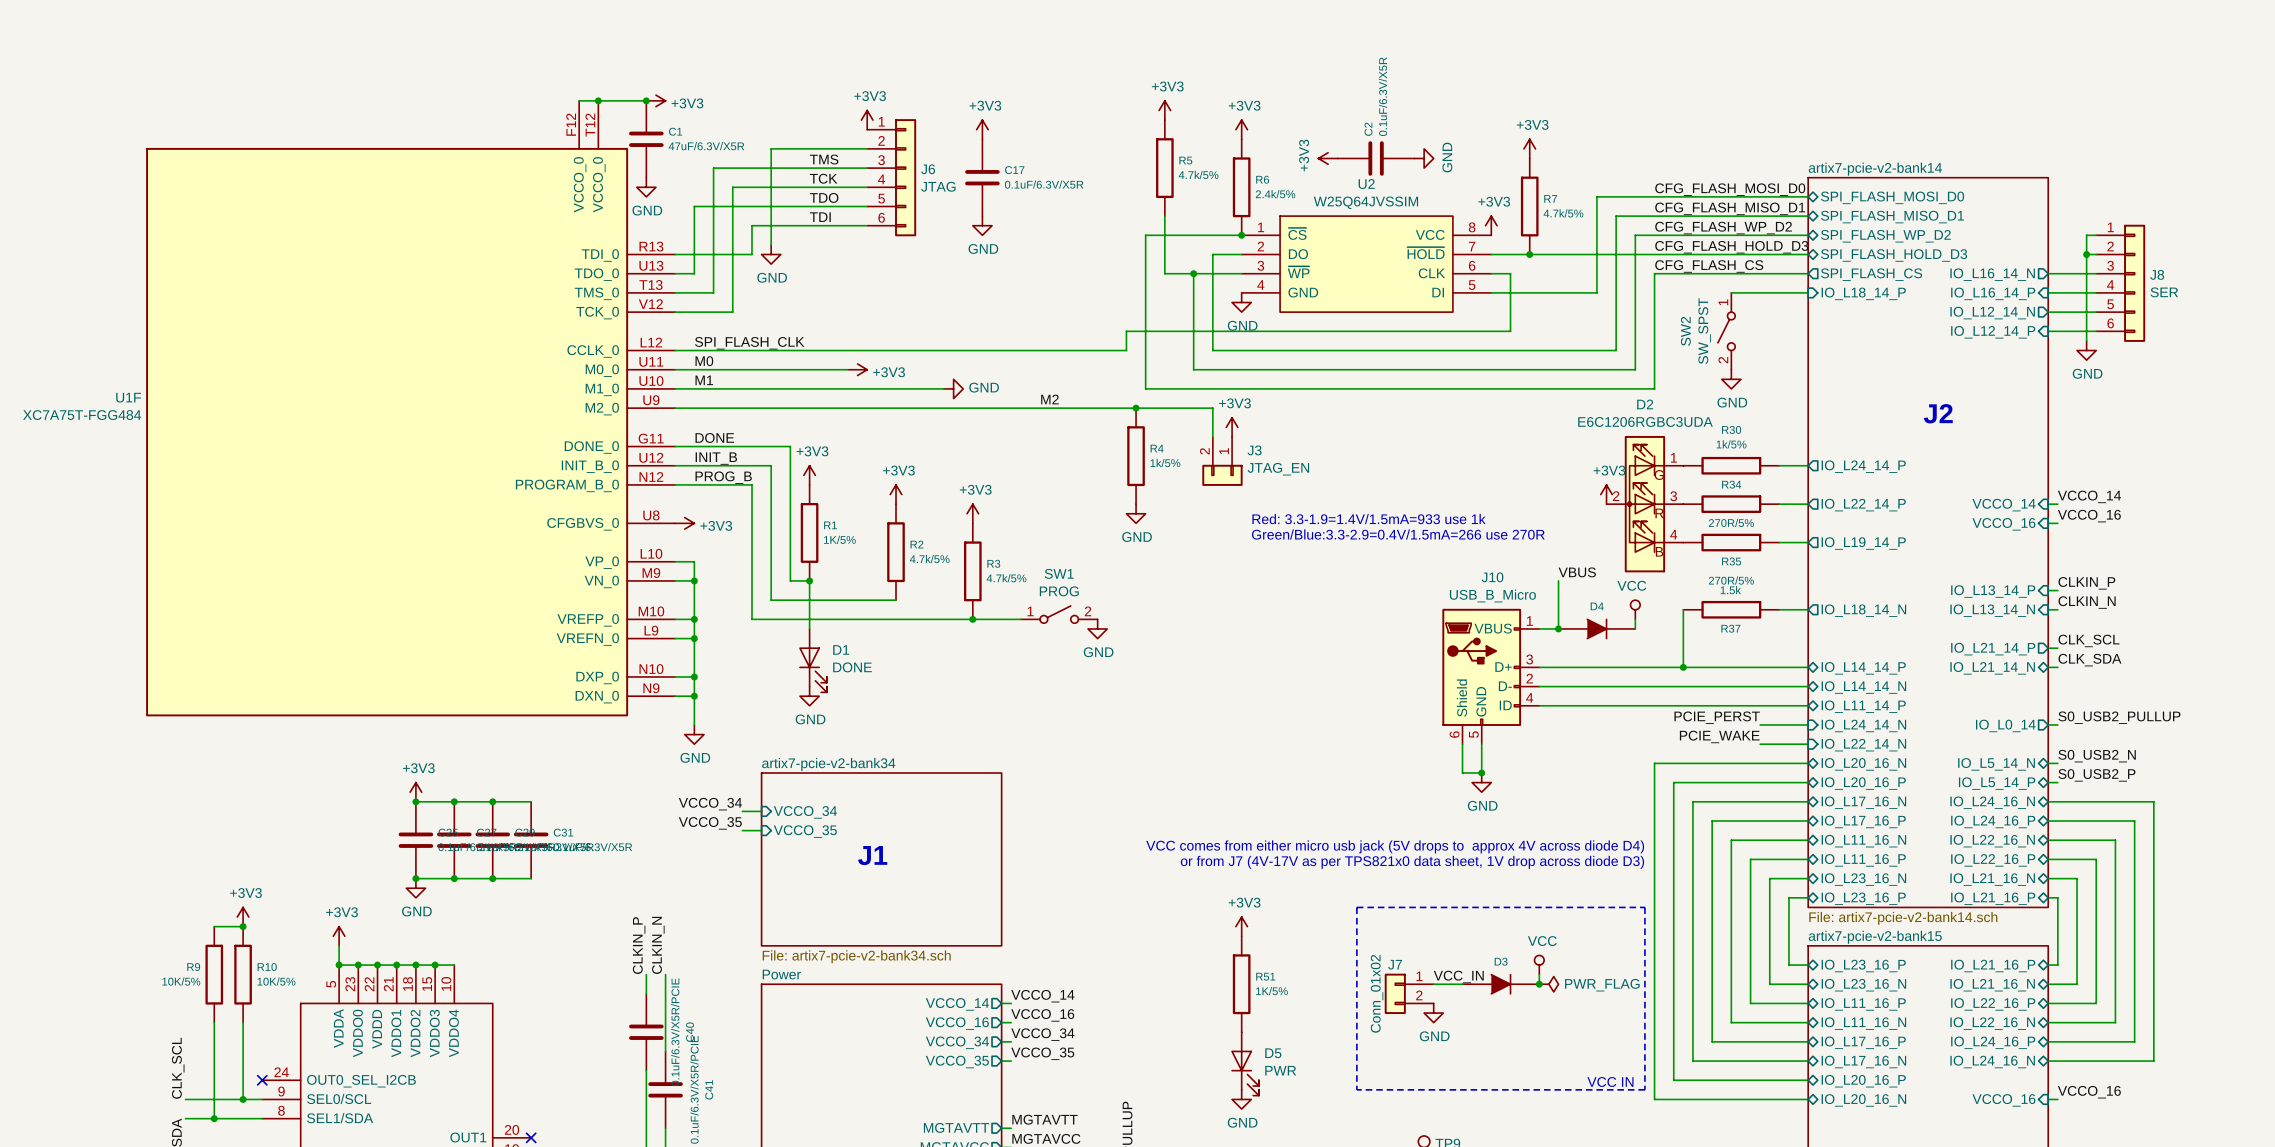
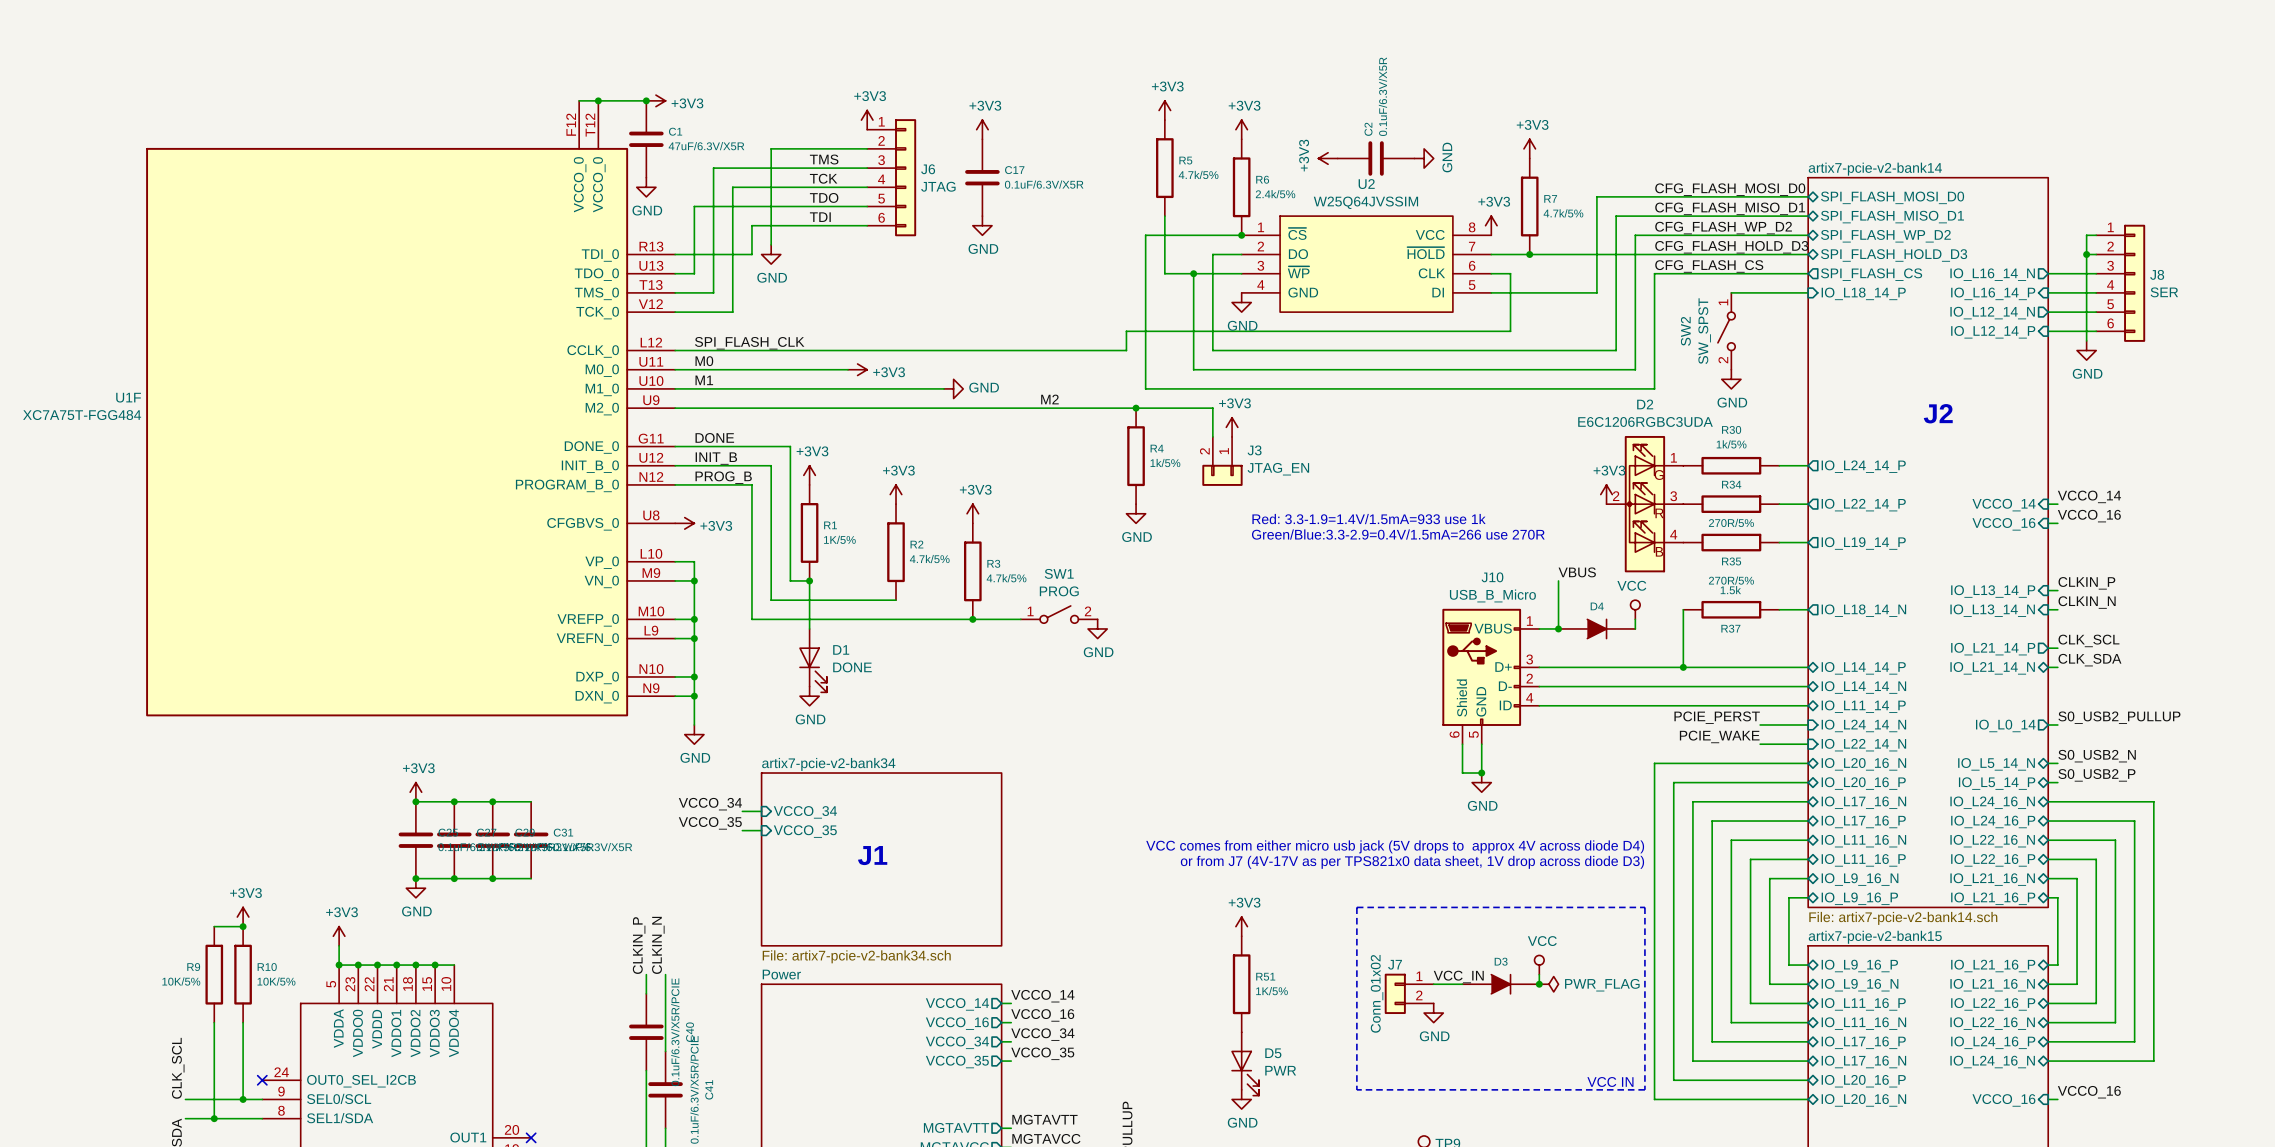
sheet pin: IO_L23_16_N (1863, 879) -> IO_L9_16_N (1860, 879)
sheet pin: IO_L23_16_P (1863, 898) -> IO_L9_16_P (1859, 898)
sheet pin: IO_L23_16_P (1863, 965) -> IO_L9_16_P (1859, 965)
sheet pin: IO_L23_16_N (1863, 985) -> IO_L9_16_N (1860, 985)

